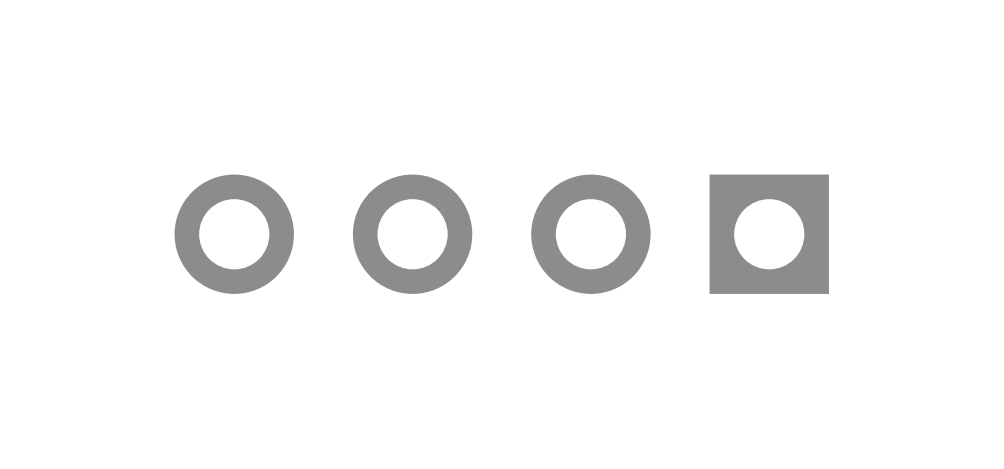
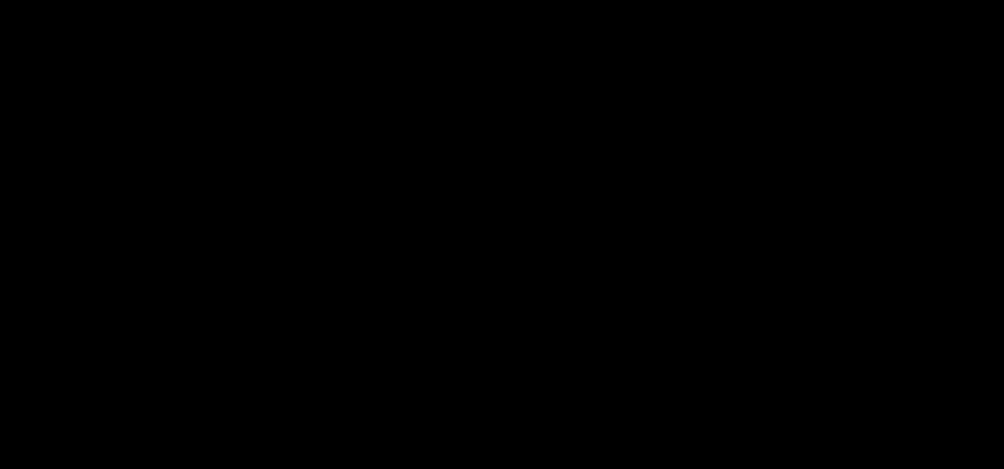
part: (501, 234) -> none

